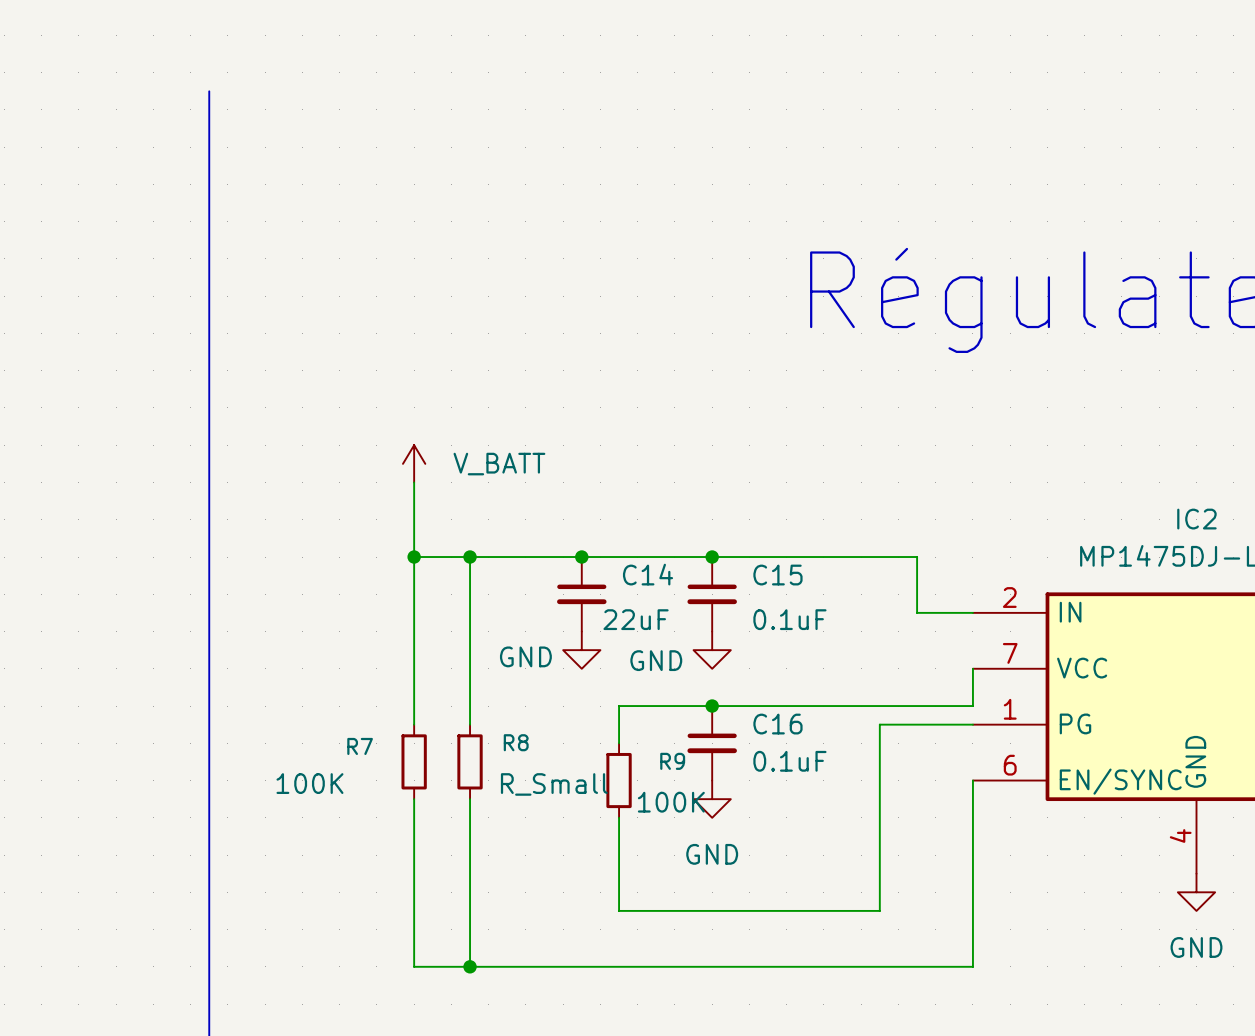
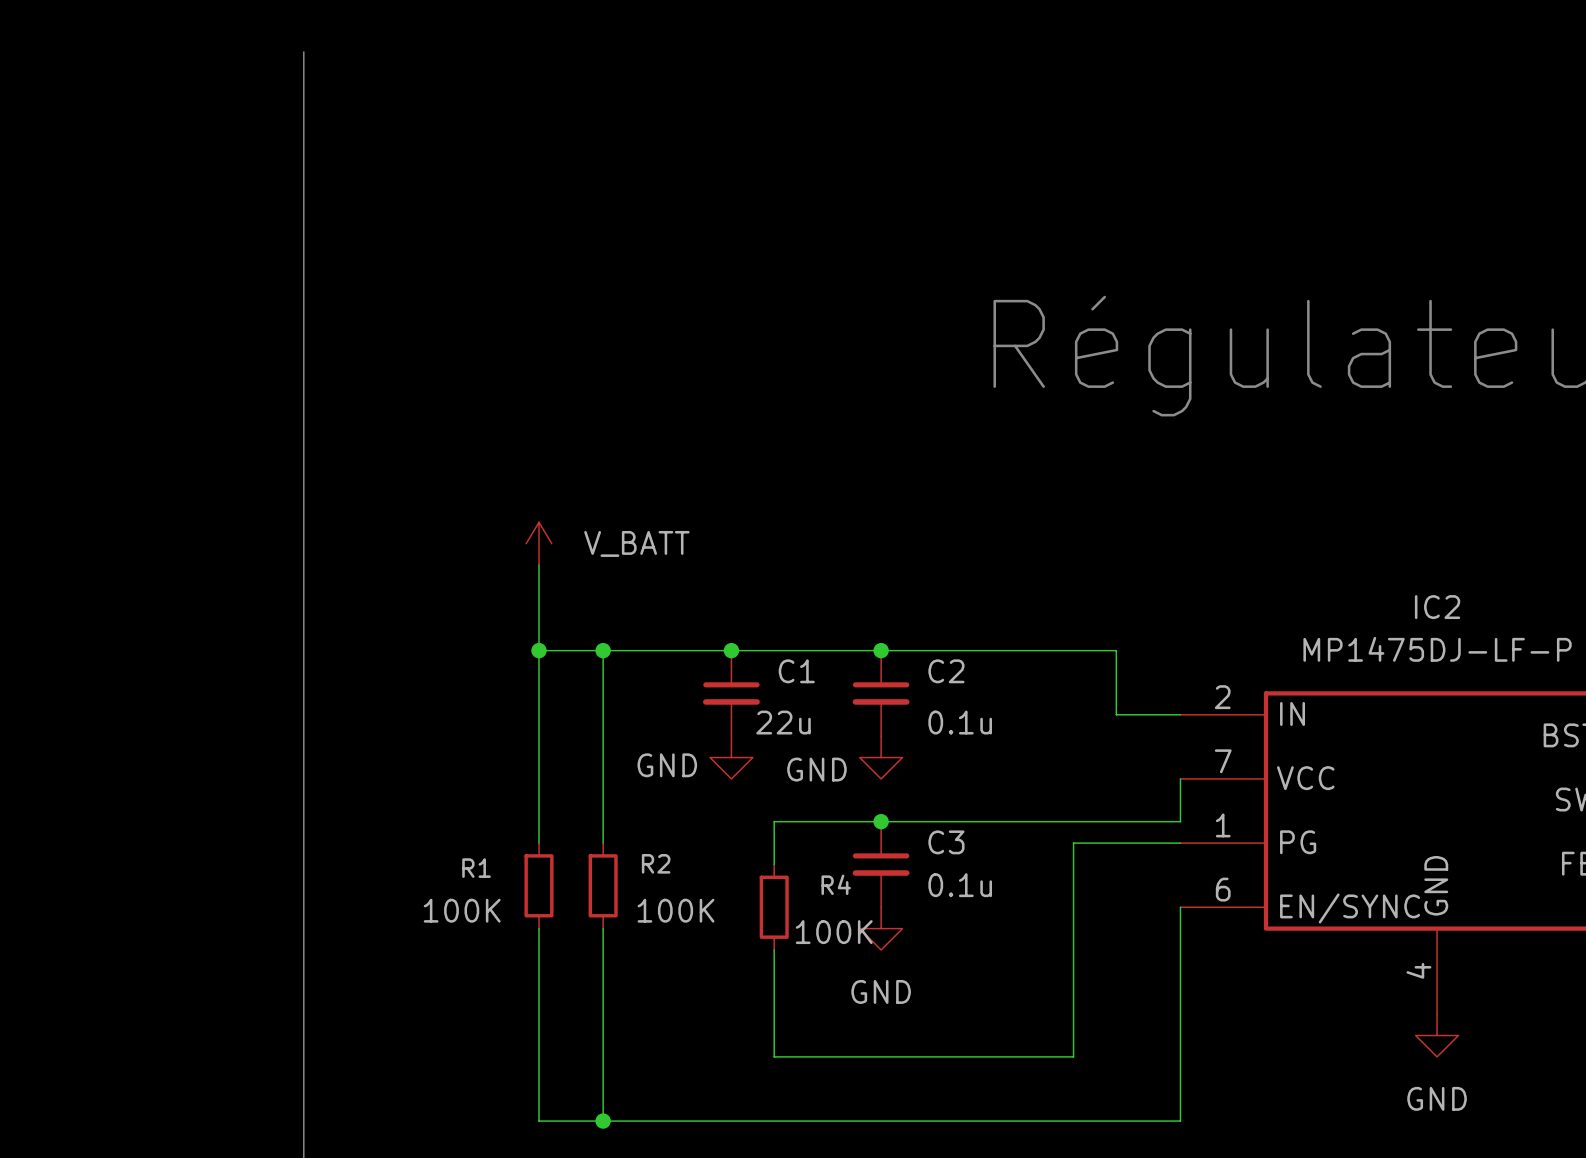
bus: none -> (303, 51) (303, 116)
C14 name: C14 (648, 574) -> C1 (796, 671)
C15 name: C15 (777, 575) -> C2 (946, 671)
C14 value: 22uF (636, 619) -> 22u (783, 722)
C15 value: 0.1uF (789, 619) -> 0.1u (960, 722)
C16 name: C16 (777, 724) -> C3 (946, 842)
R8 name: R8 (516, 742) -> R2 (656, 863)
R7 name: R7 (360, 746) -> R1 (476, 868)
R9 name: R9 (672, 761) -> R4 (836, 884)
C16 value: 0.1uF (789, 761) -> 0.1u (960, 885)
R7 value position: 100K (309, 783) -> 100K (462, 910)
R8 value: R_Small (554, 784) -> 100K (676, 910)

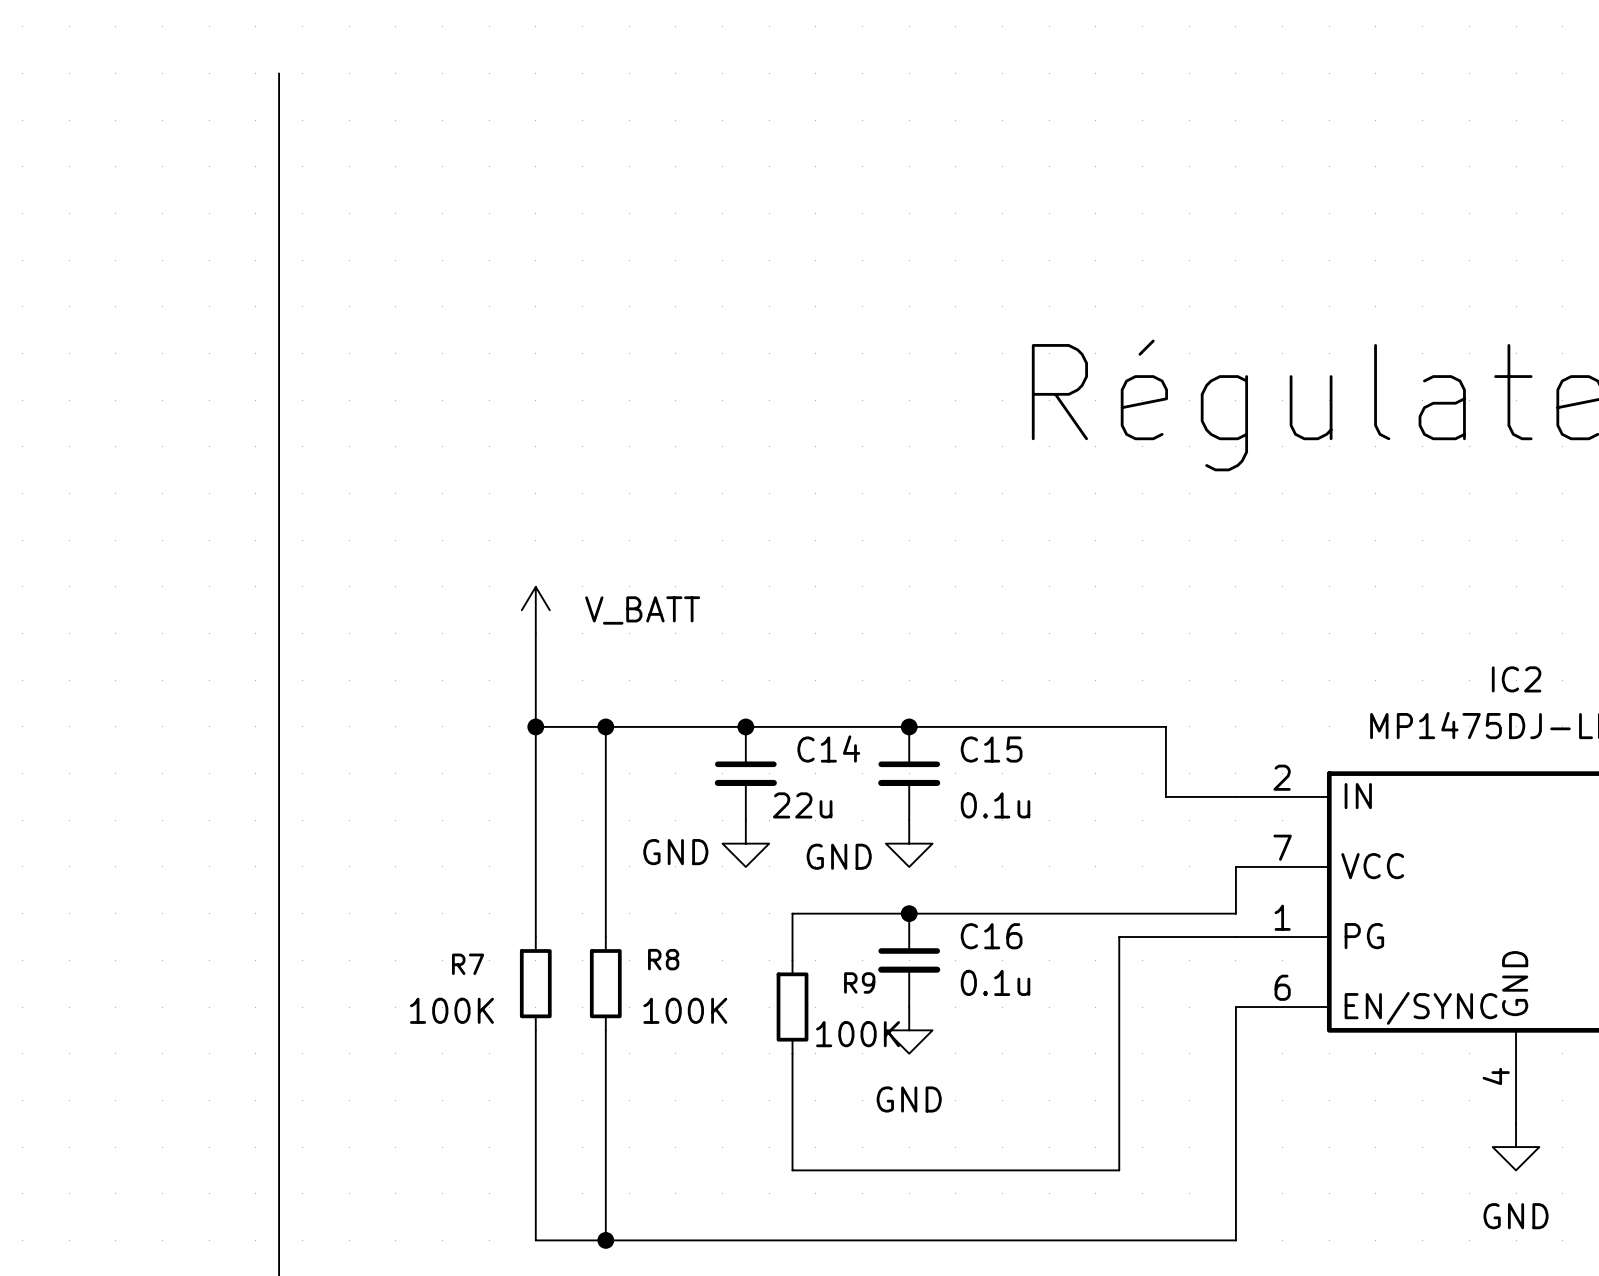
C1 name: C1 (796, 671) -> C14 (828, 748)
C2 name: C2 (946, 671) -> C15 (991, 749)
C3 name: C3 (946, 842) -> C16 (991, 936)
R2 name: R2 (656, 863) -> R8 (663, 959)
R1 name: R1 (476, 868) -> R7 (468, 964)
R4 name: R4 (836, 884) -> R9 (859, 982)

